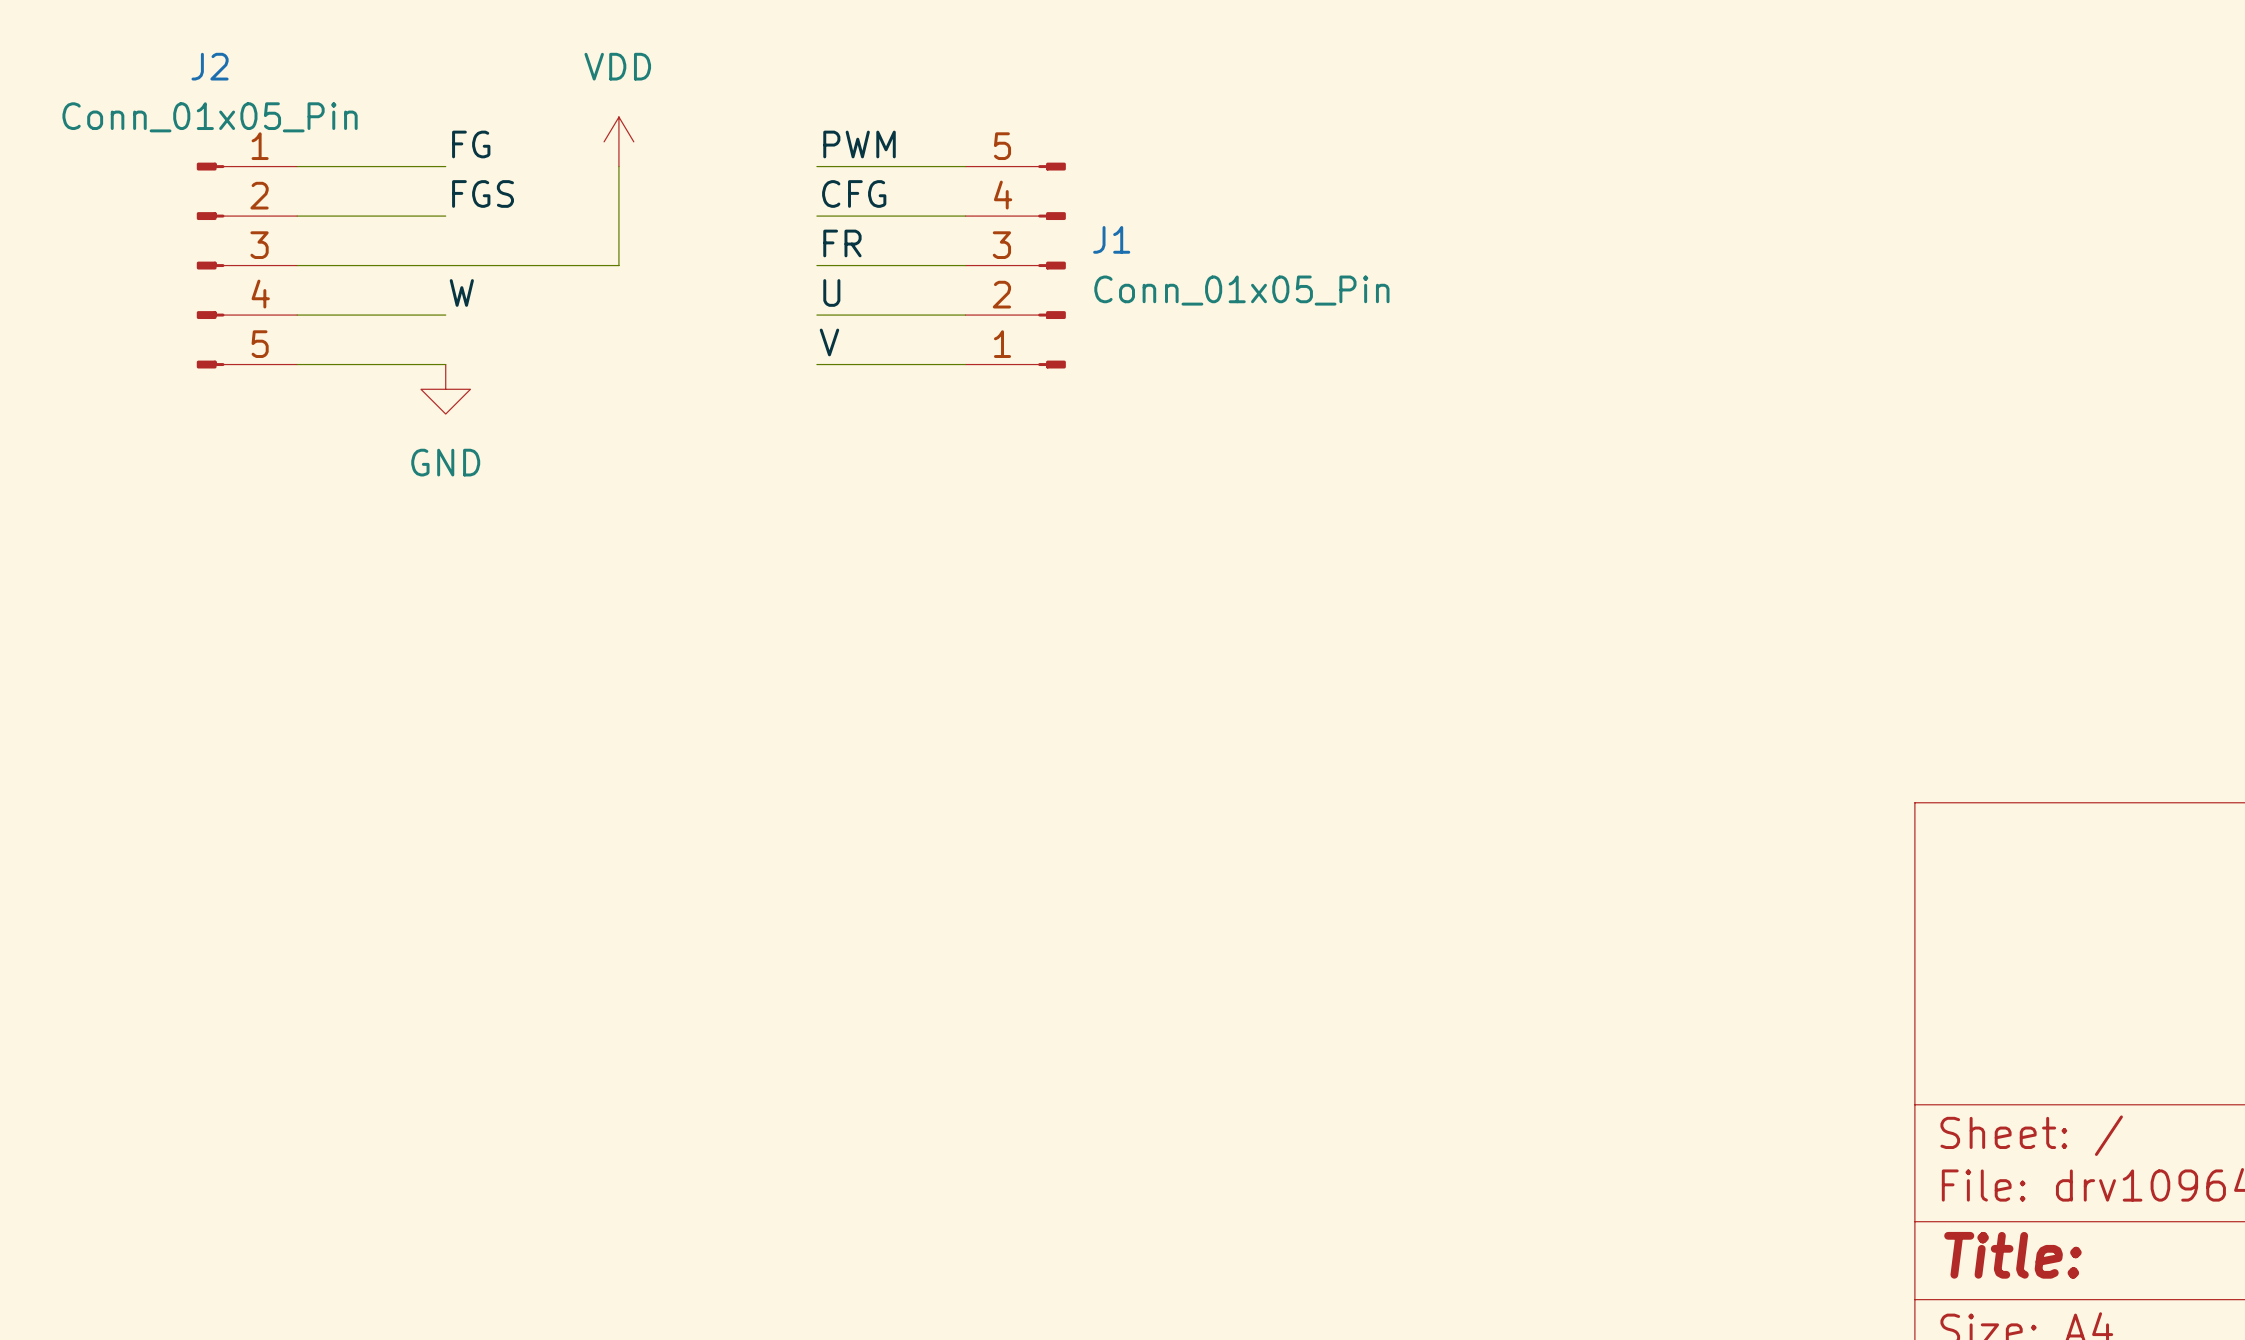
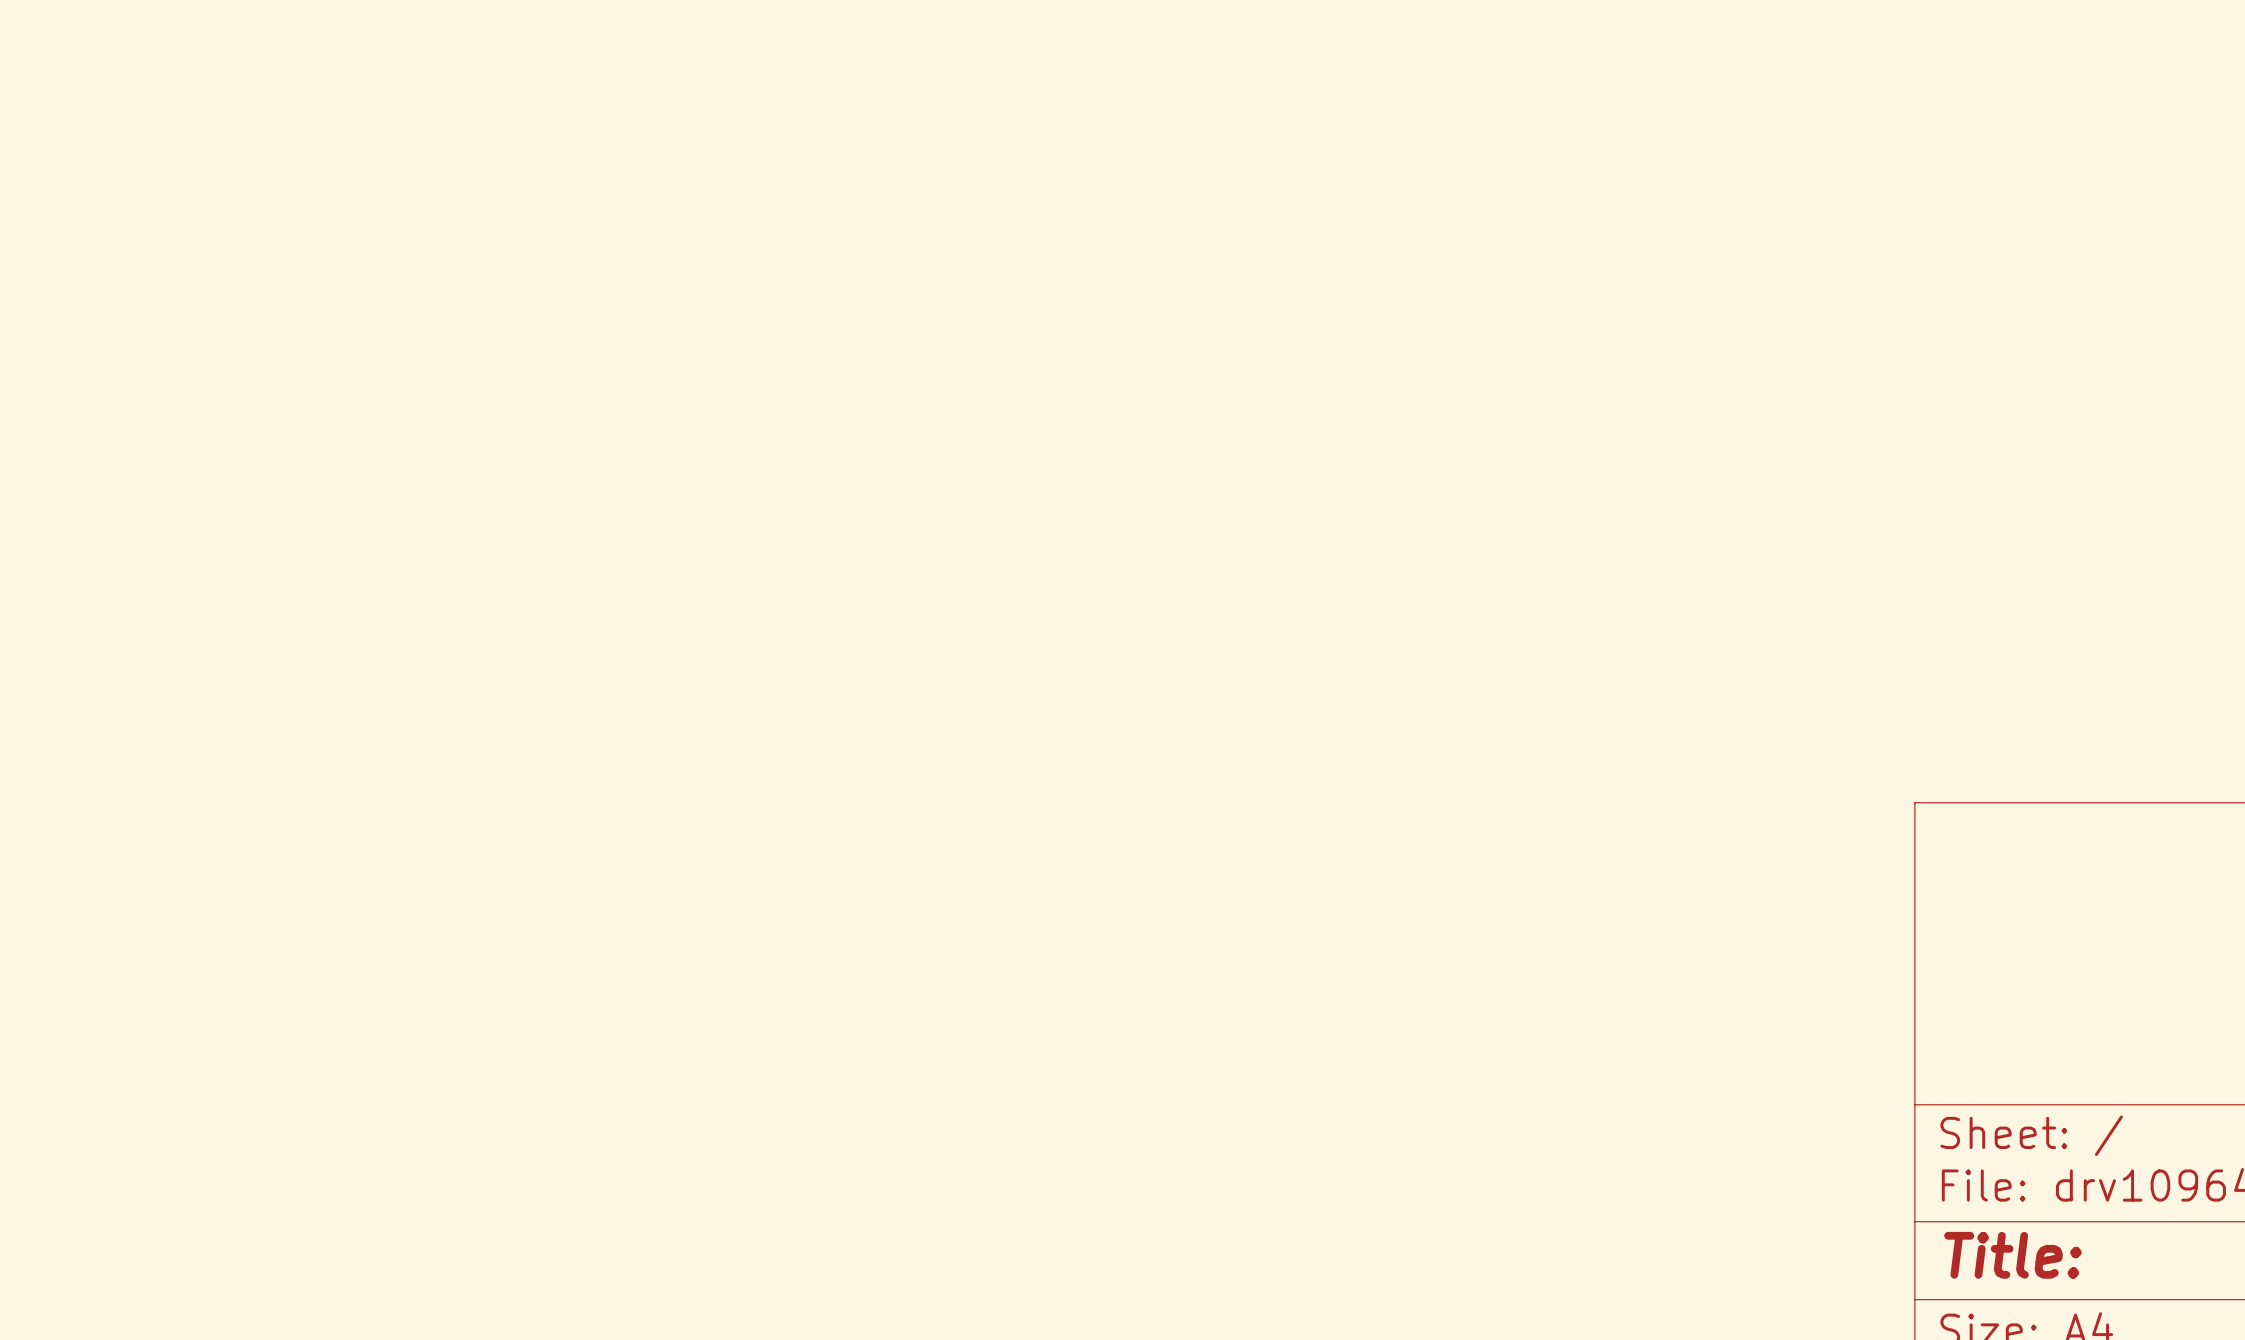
power symbol: VDD (618, 141) -> none
label: FG (471, 144) -> none
label: PWM (859, 144) -> none
wire: (297, 166) (445, 166) -> none
wire: (618, 166) (618, 265) (297, 265) -> none
wire: (816, 166) (965, 166) -> none
label: FGS (483, 193) -> none
label: CFG (854, 193) -> none
wire: (297, 216) (445, 216) -> none
wire: (816, 216) (965, 216) -> none
label: FR (842, 243) -> none
J2: Conn_01x05_Pin (247, 265) -> none
wire: (816, 265) (965, 265) -> none
J1: Conn_01x05_Pin (1015, 265) -> none
label: W (461, 292) -> none
label: U (831, 292) -> none
wire: (297, 315) (445, 315) -> none
wire: (816, 315) (965, 315) -> none
label: V (829, 342) -> none
wire: (297, 364) (445, 364) -> none
wire: (816, 364) (965, 364) -> none
power symbol: GND (445, 389) -> none

